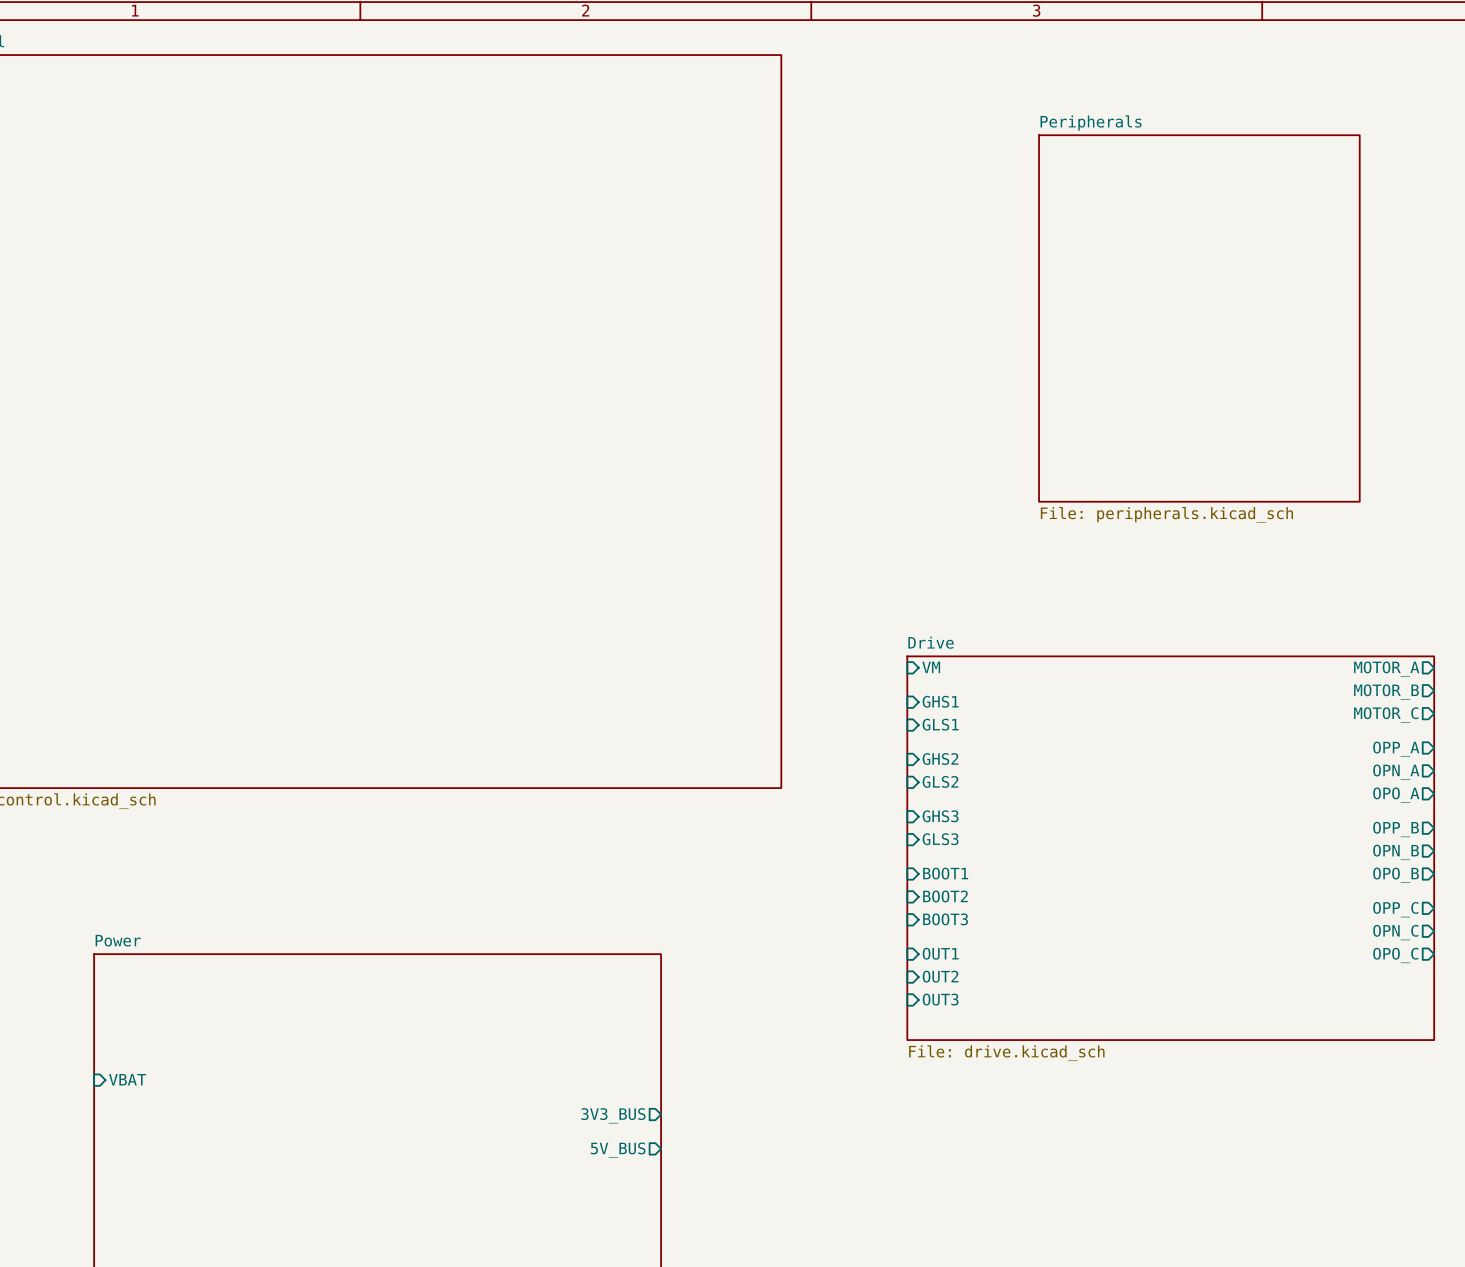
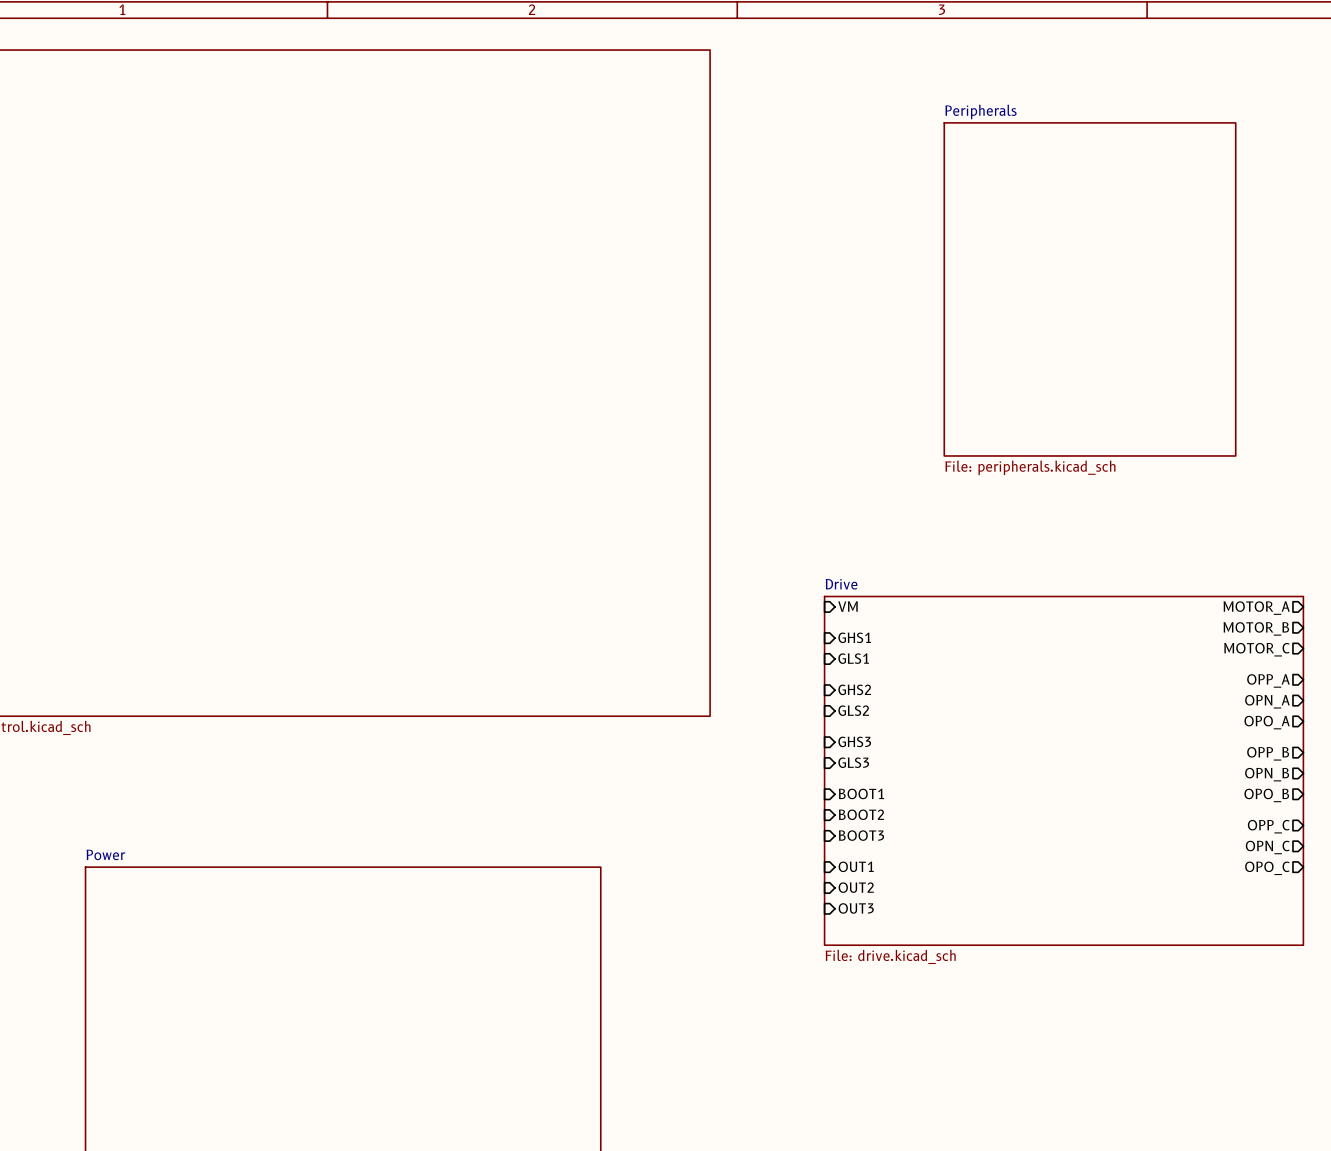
sheet pin: VBAT (127, 1079) -> none
sheet pin: 3V3_BUS (613, 1115) -> none
sheet pin: 5V_BUS (618, 1150) -> none

